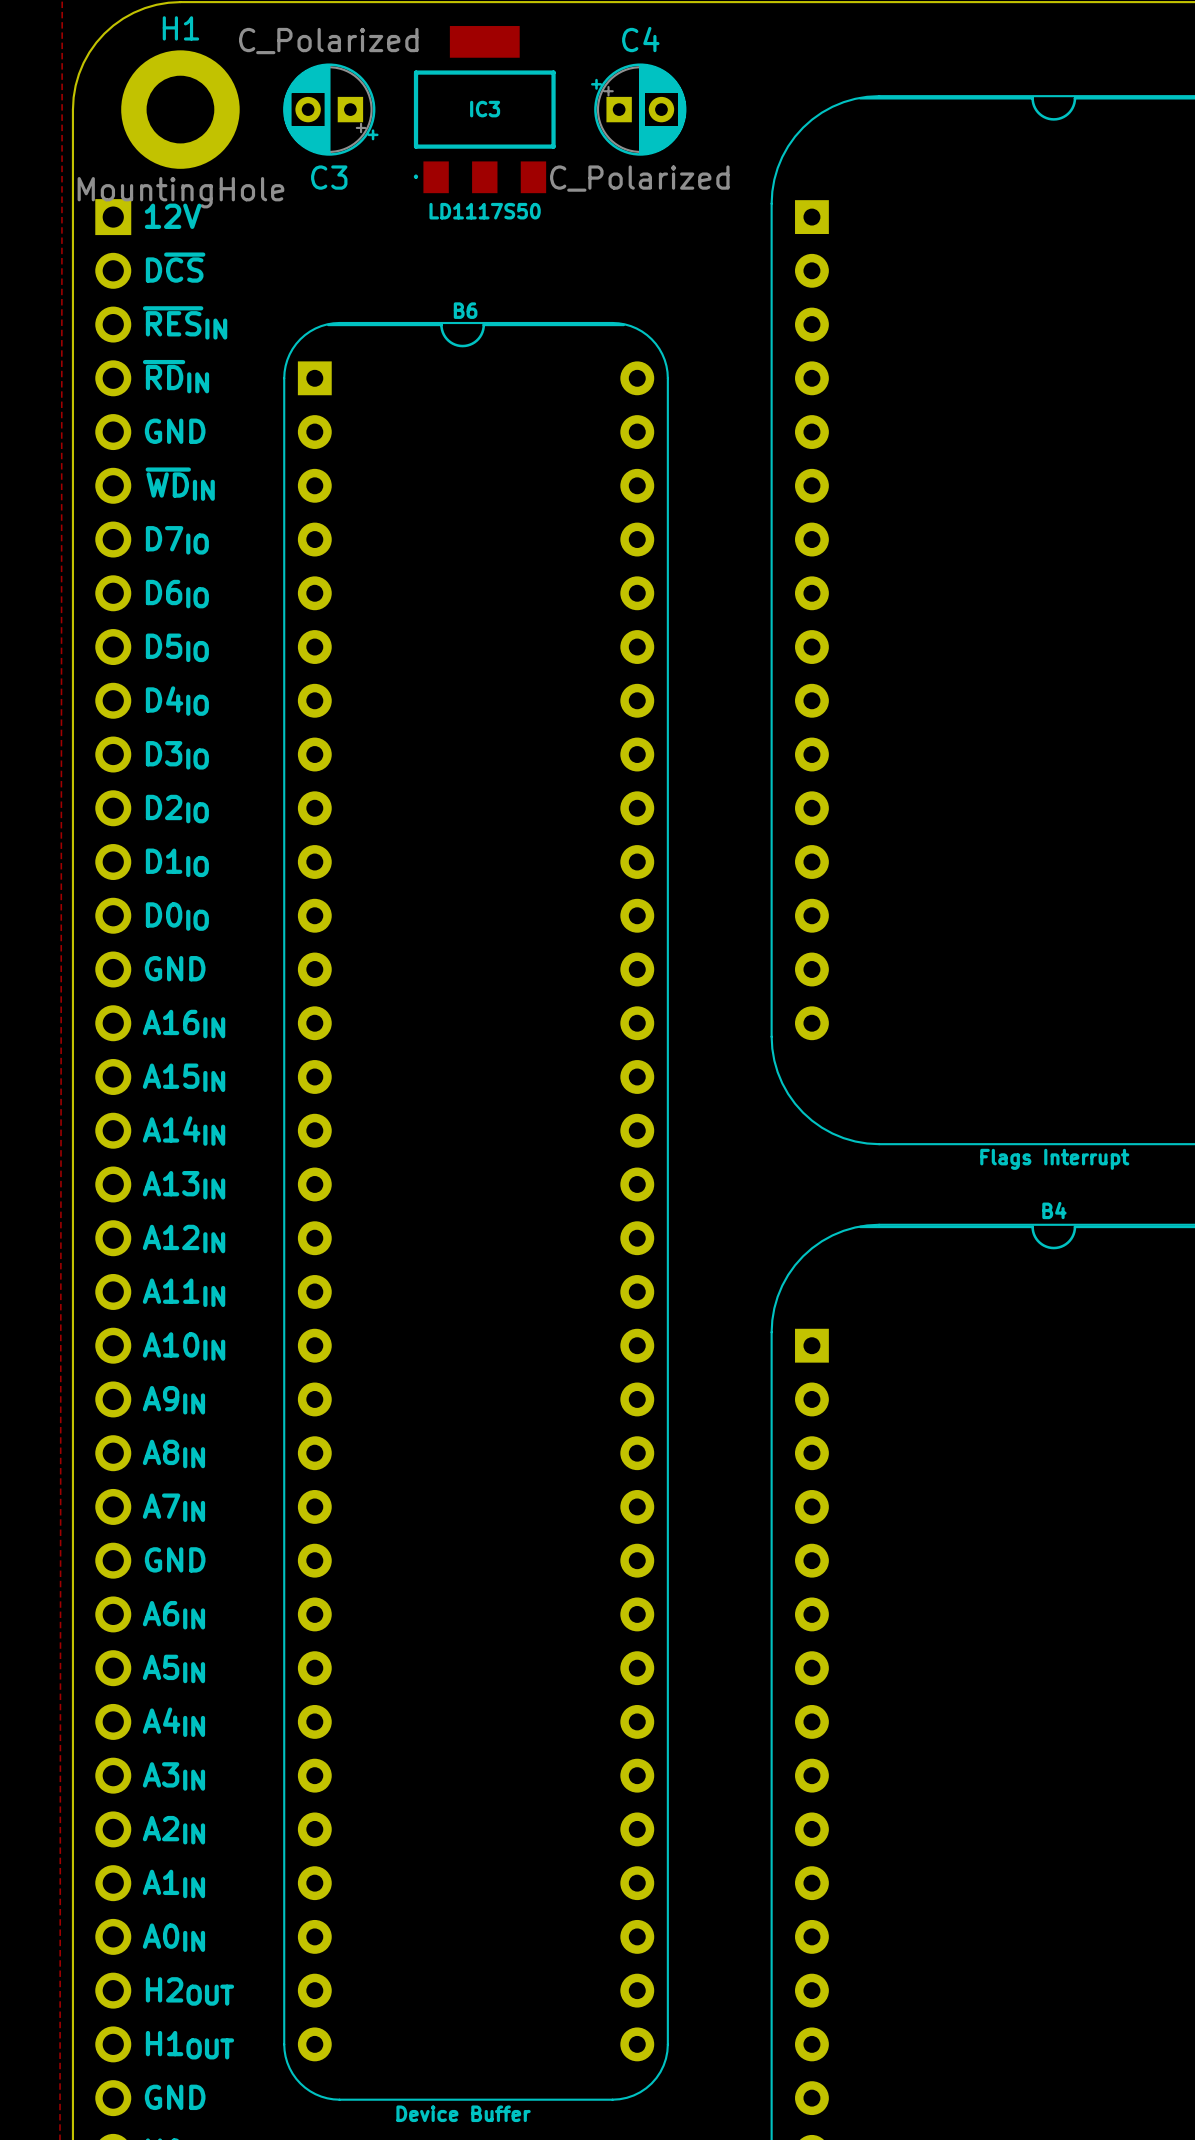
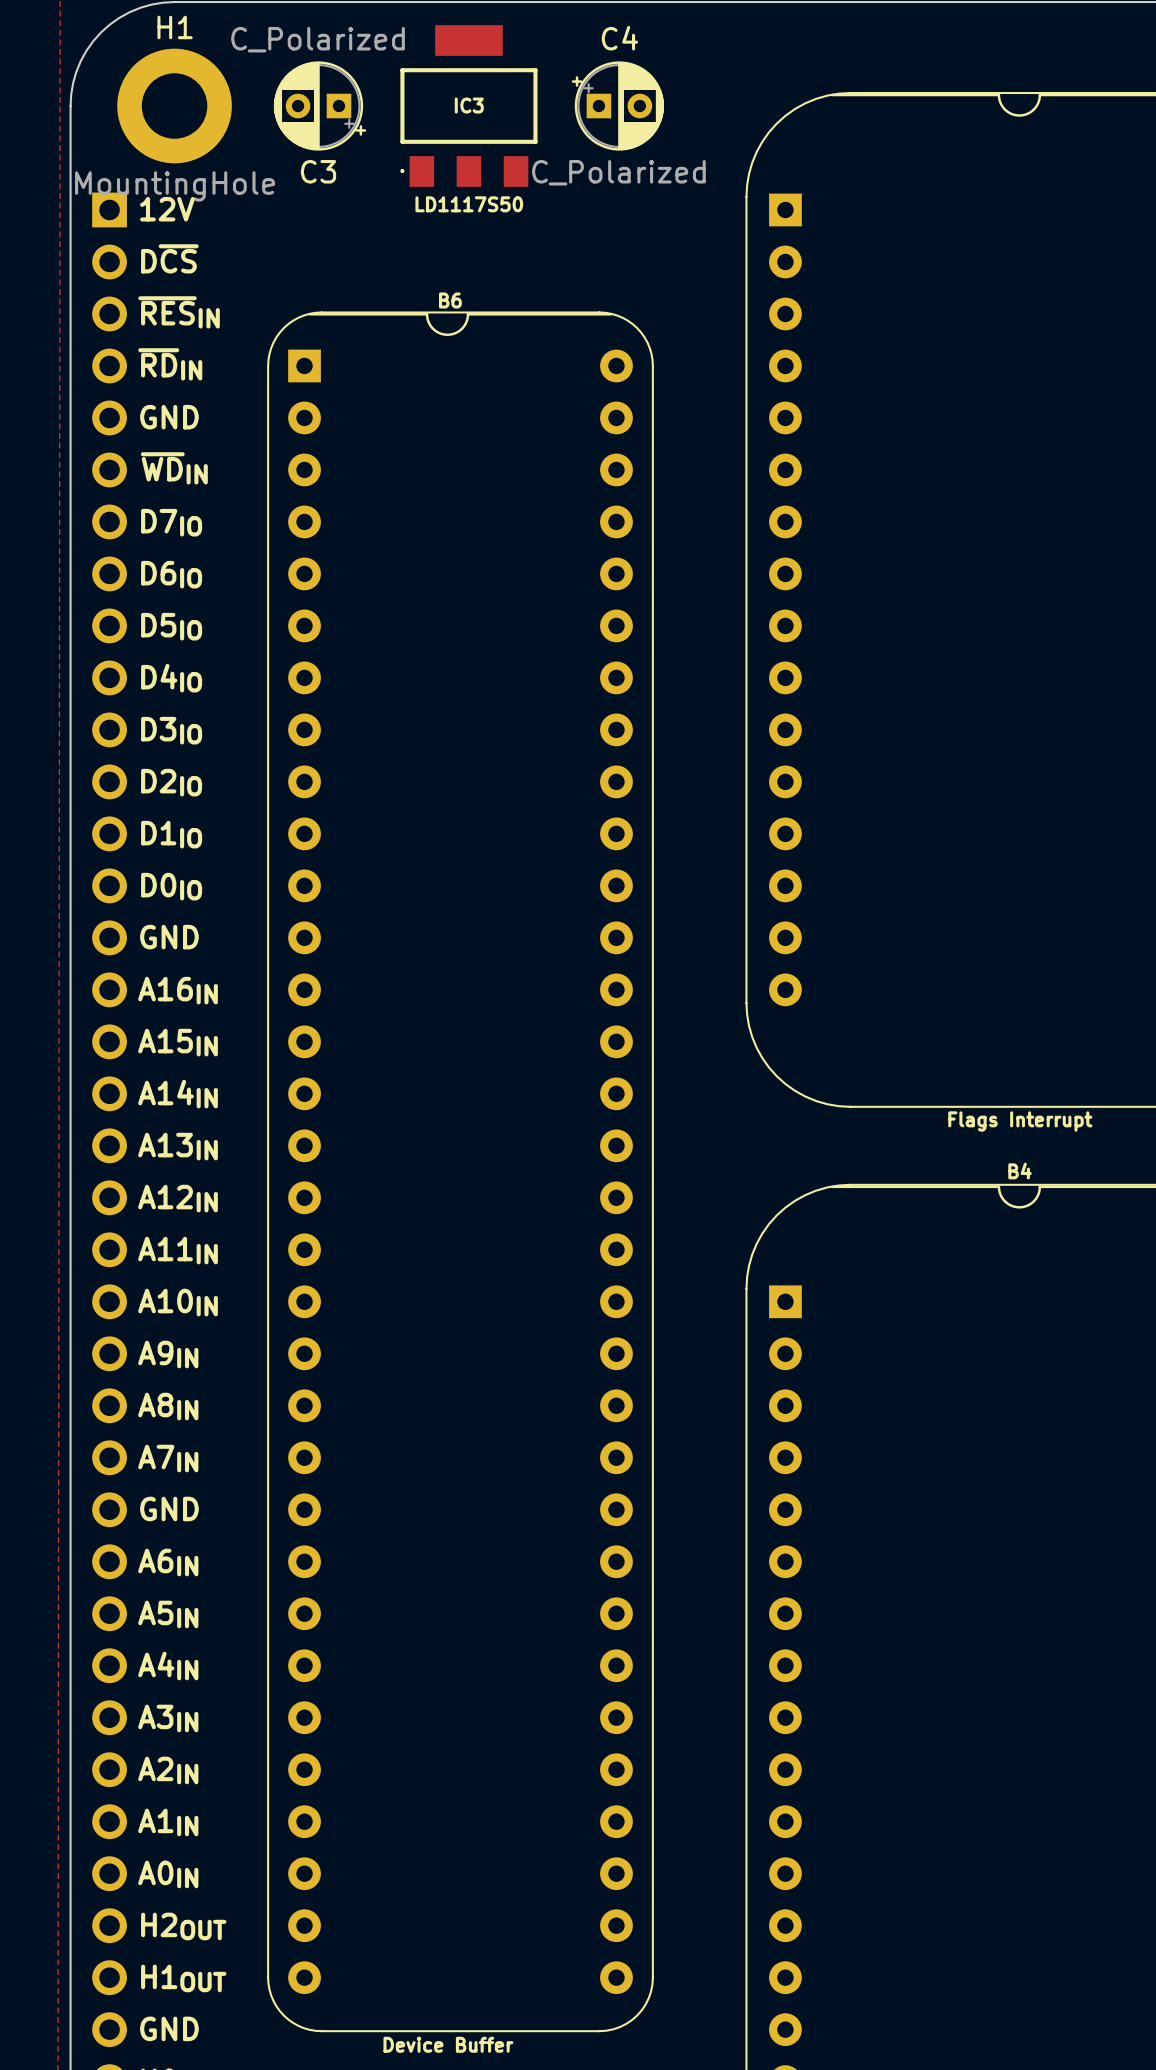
B6 footprint: [283, 321, 669, 2101] -> [267, 311, 654, 2033]

